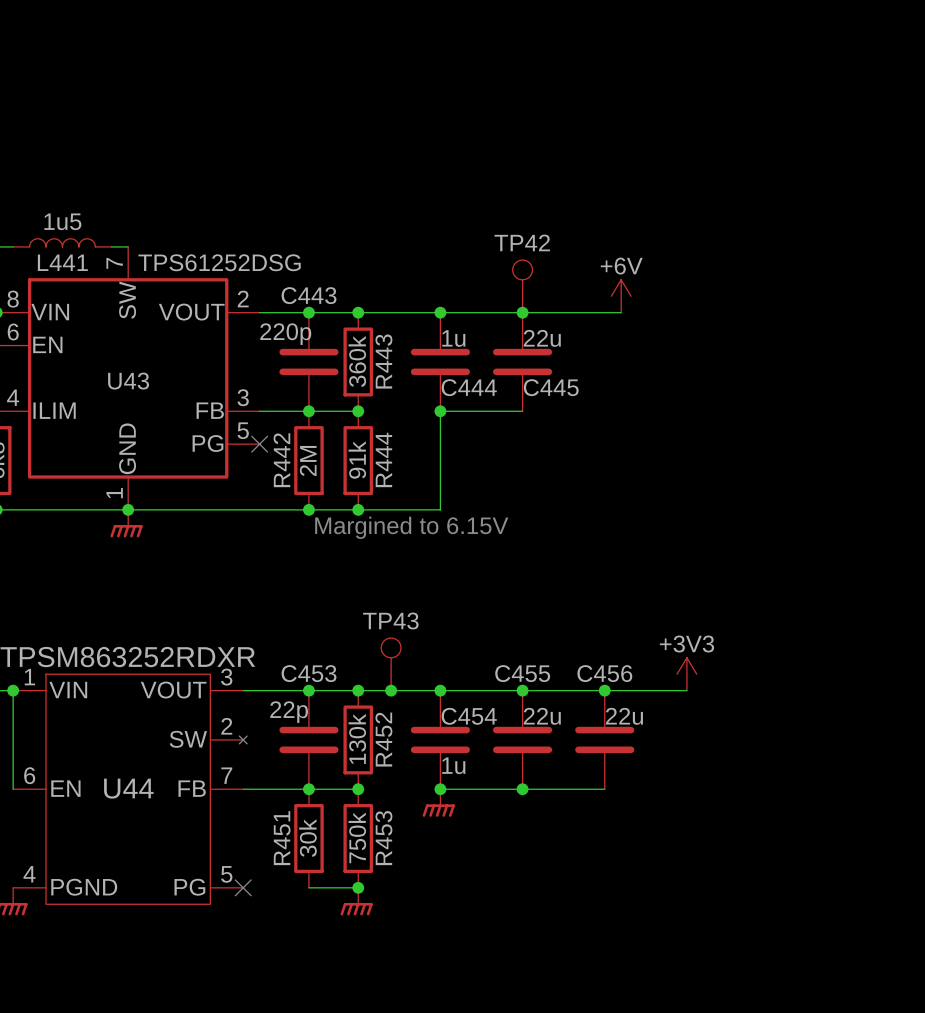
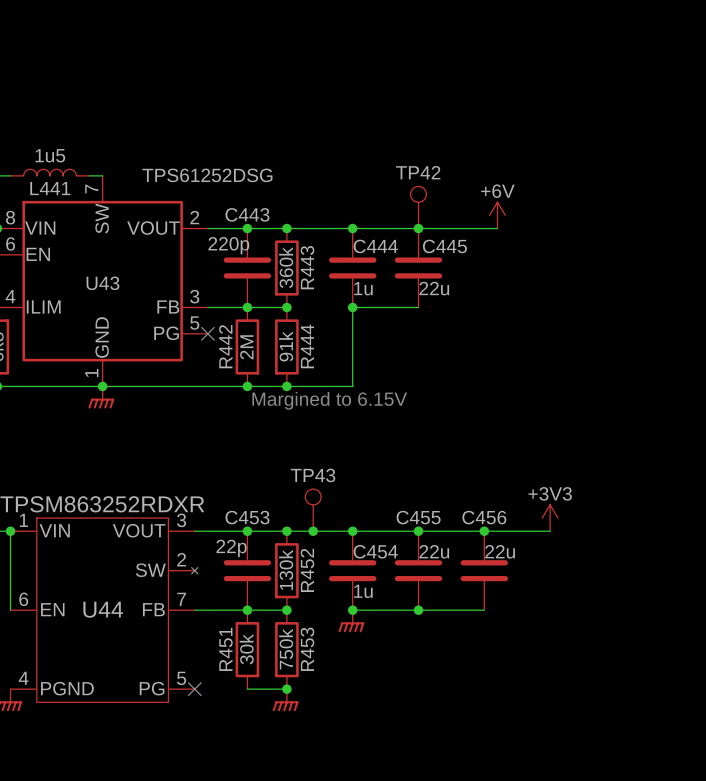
U43 value position: TPS61252DSG (219, 262) -> TPS61252DSG (207, 175)
C444 value position: 1u (453, 338) -> 1u (363, 288)
C445 value position: 22u (542, 338) -> 22u (434, 288)
C444 name position: C444 (469, 387) -> C444 (375, 246)
C445 name position: C445 (551, 387) -> C445 (444, 246)

